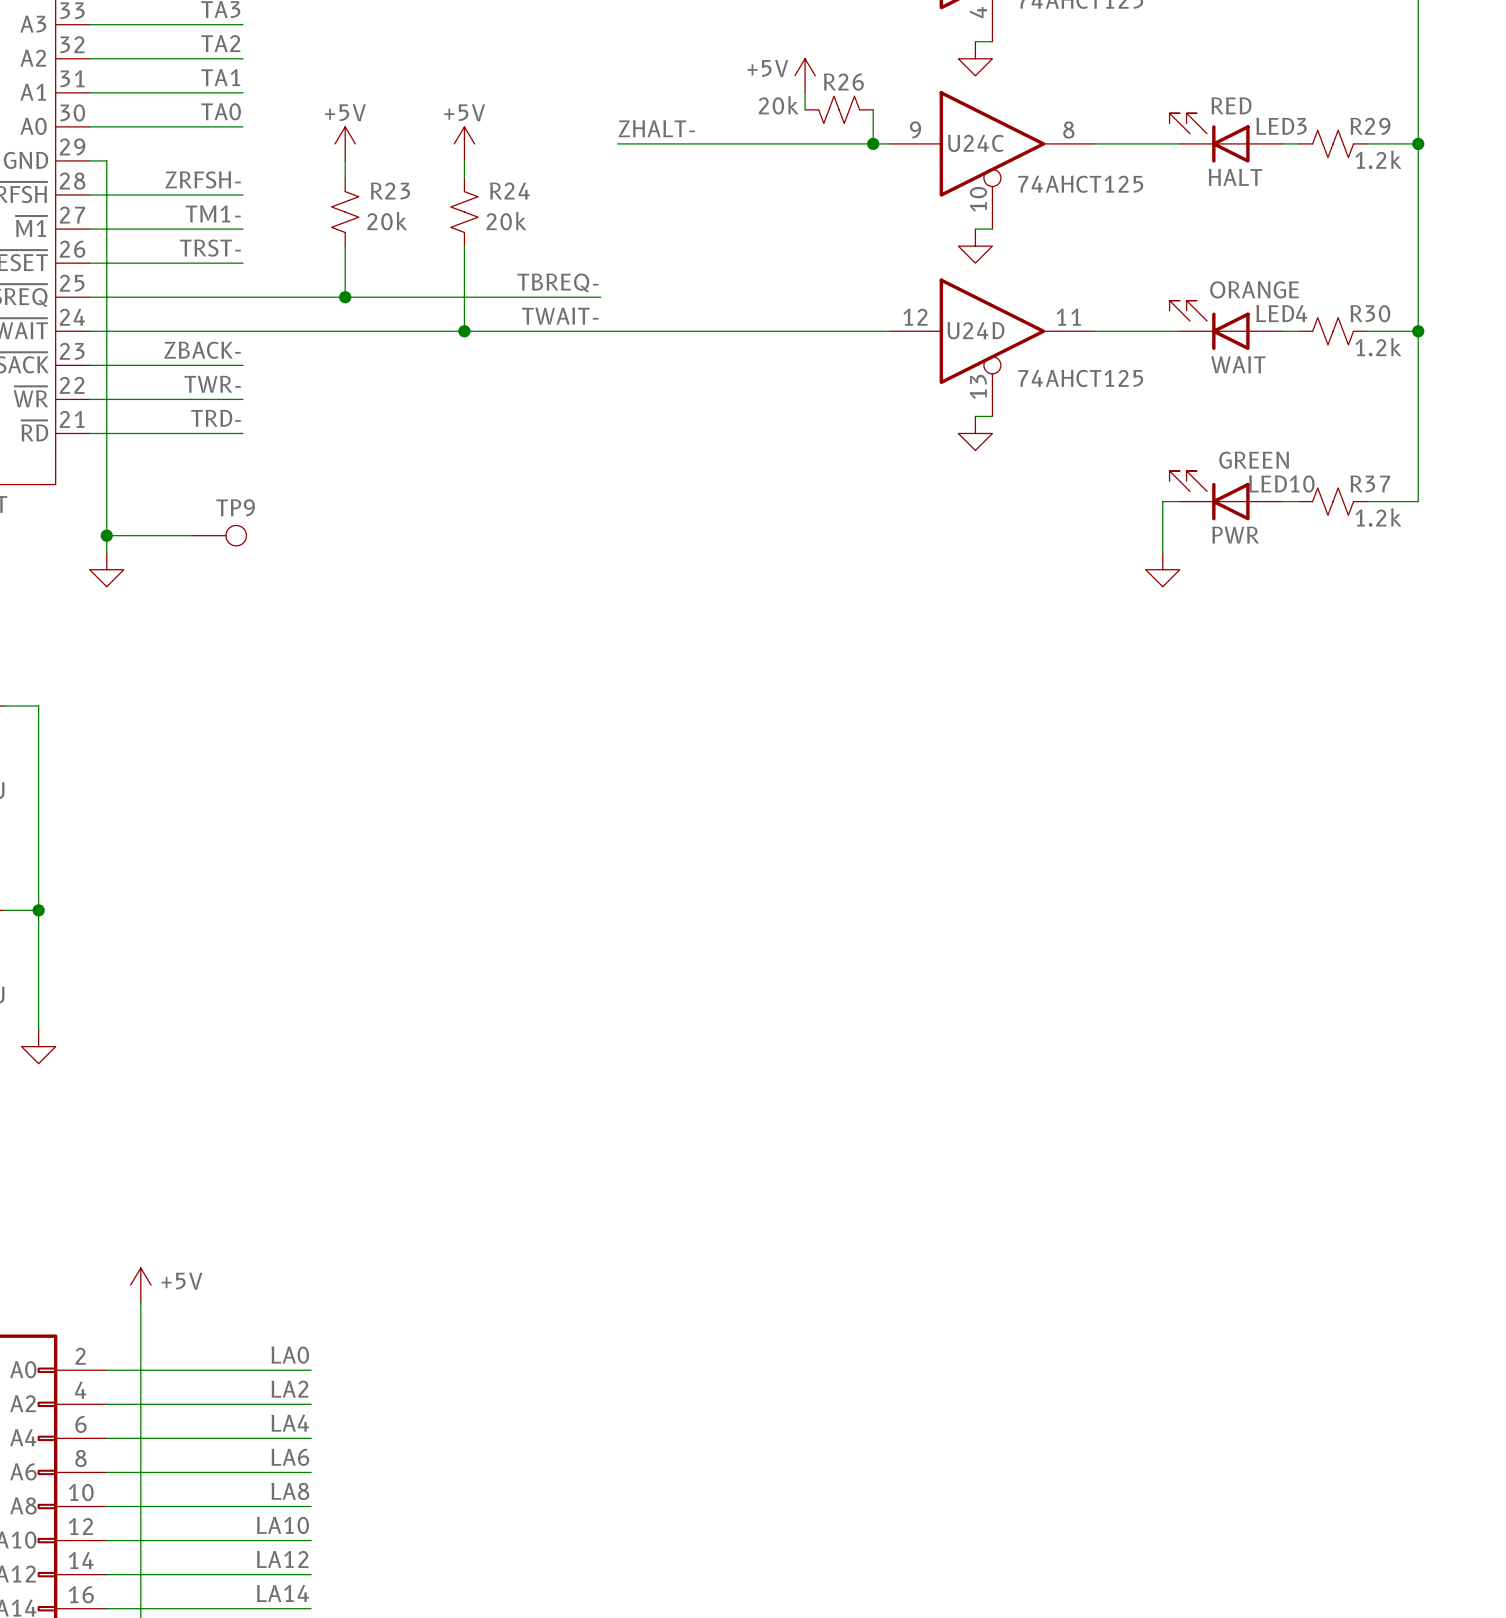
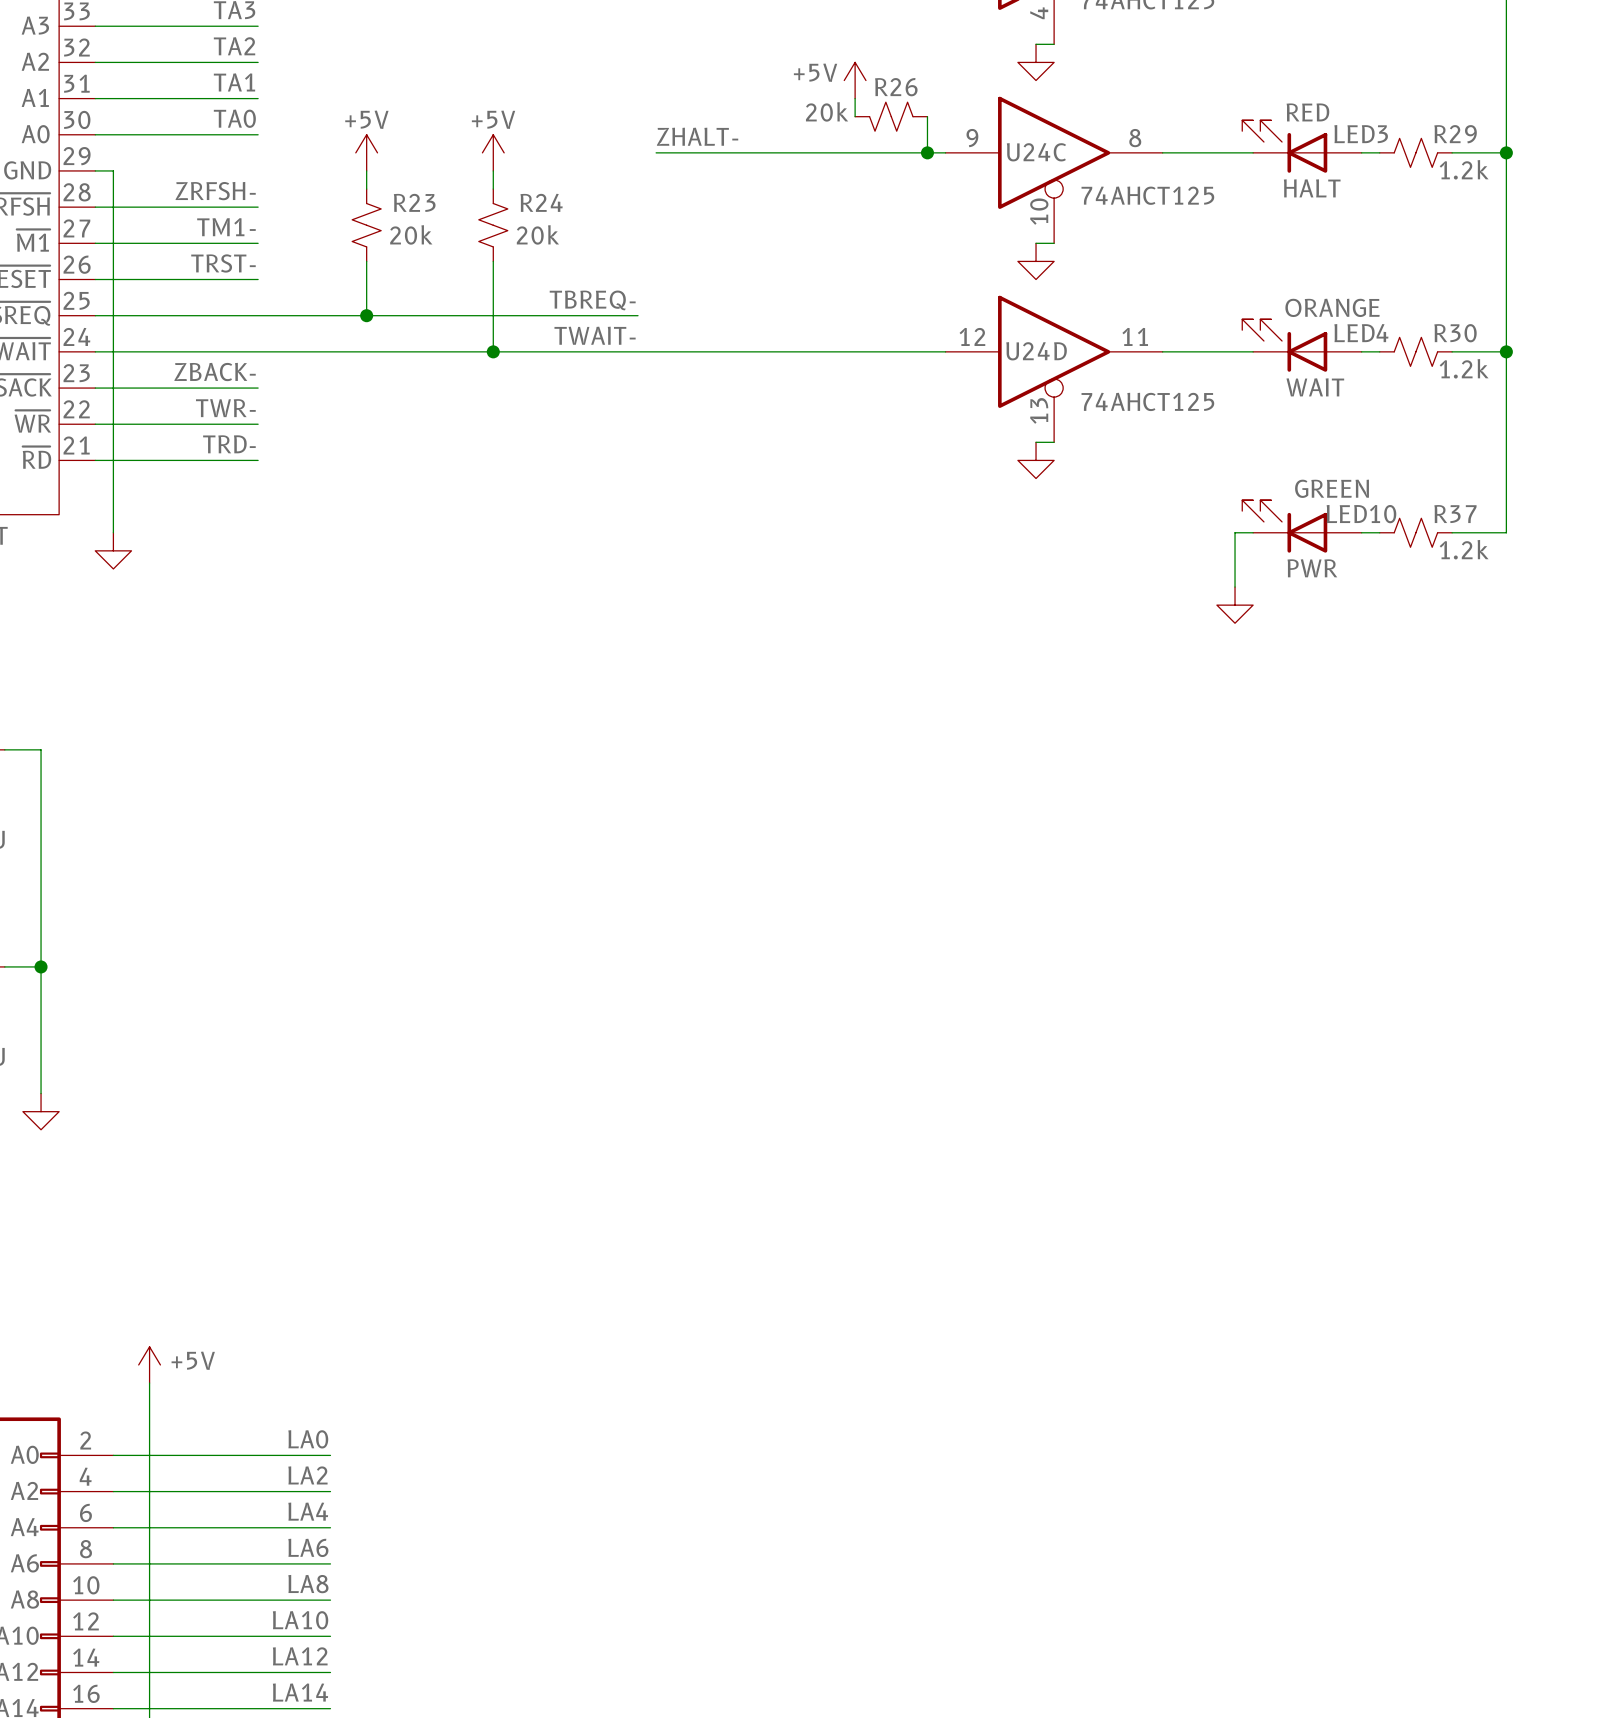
wire: (106, 501) (106, 552) -> none
wire: (106, 535) (191, 535) -> none
junction: (106, 535) -> none
TP9: (219, 535) -> none
power symbol position: (106, 569) -> (113, 550)

